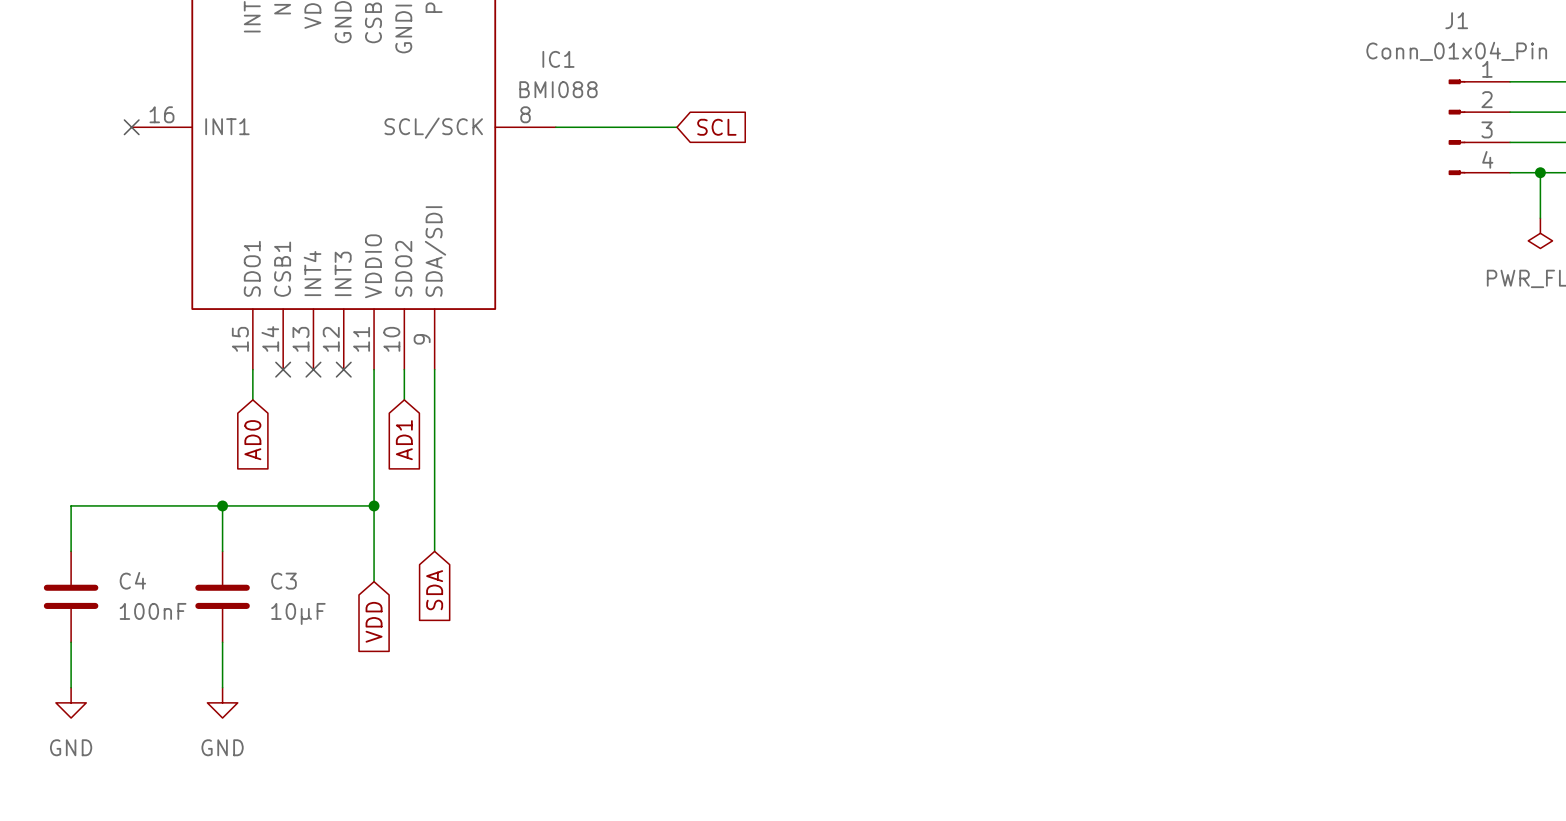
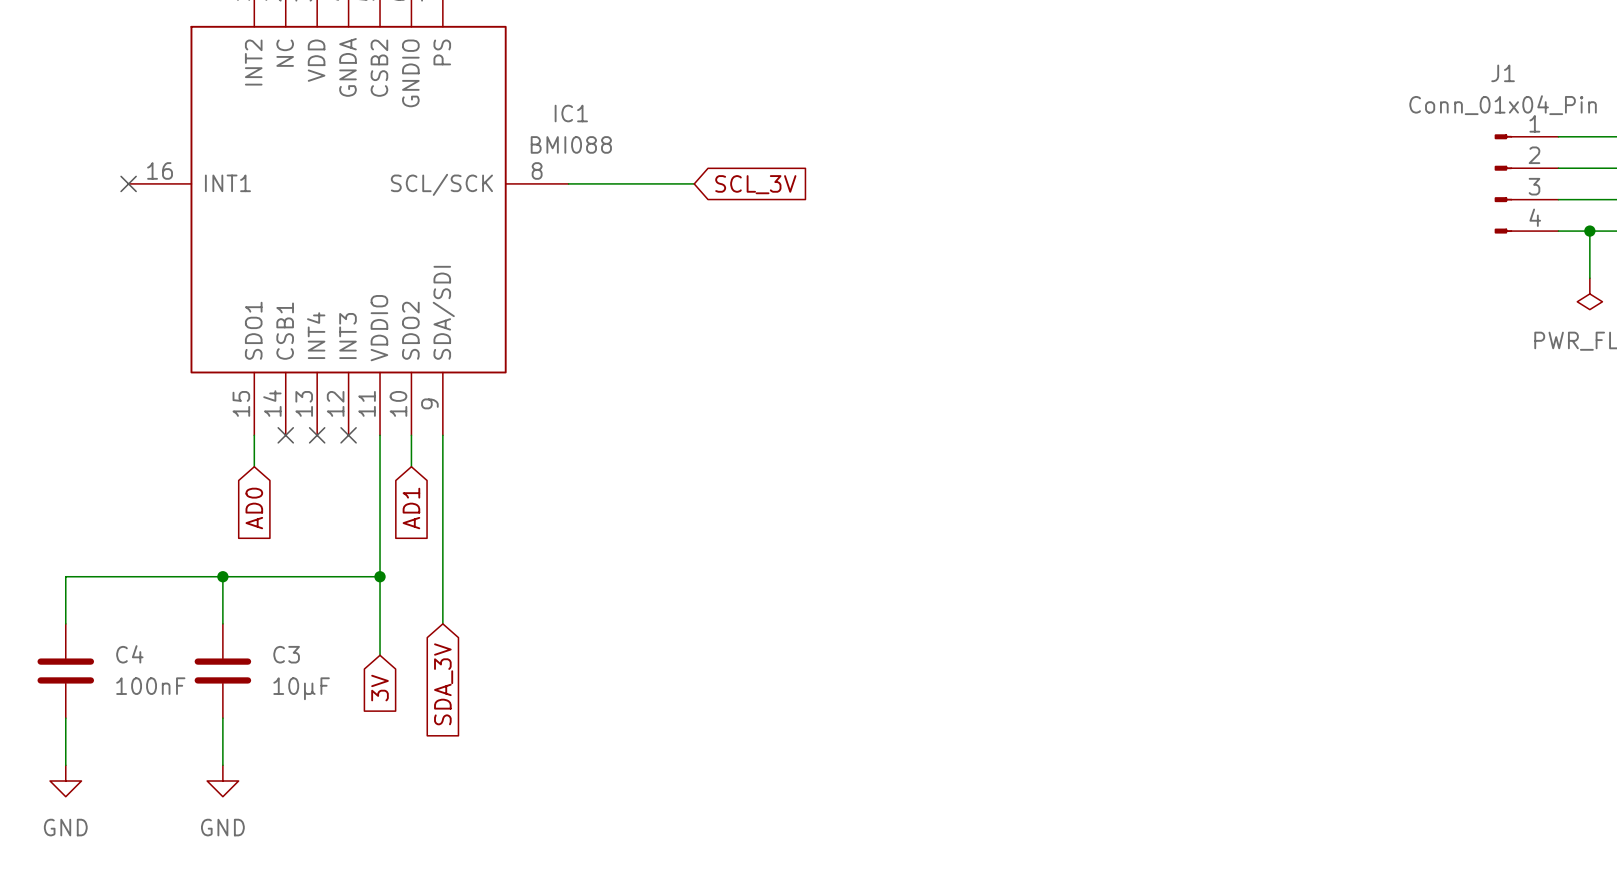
global label: SCL (716, 127) -> SCL_3V (755, 184)
global label: SDA (434, 590) -> SDA_3V (443, 684)
global label: VDD (374, 622) -> 3V (380, 688)

